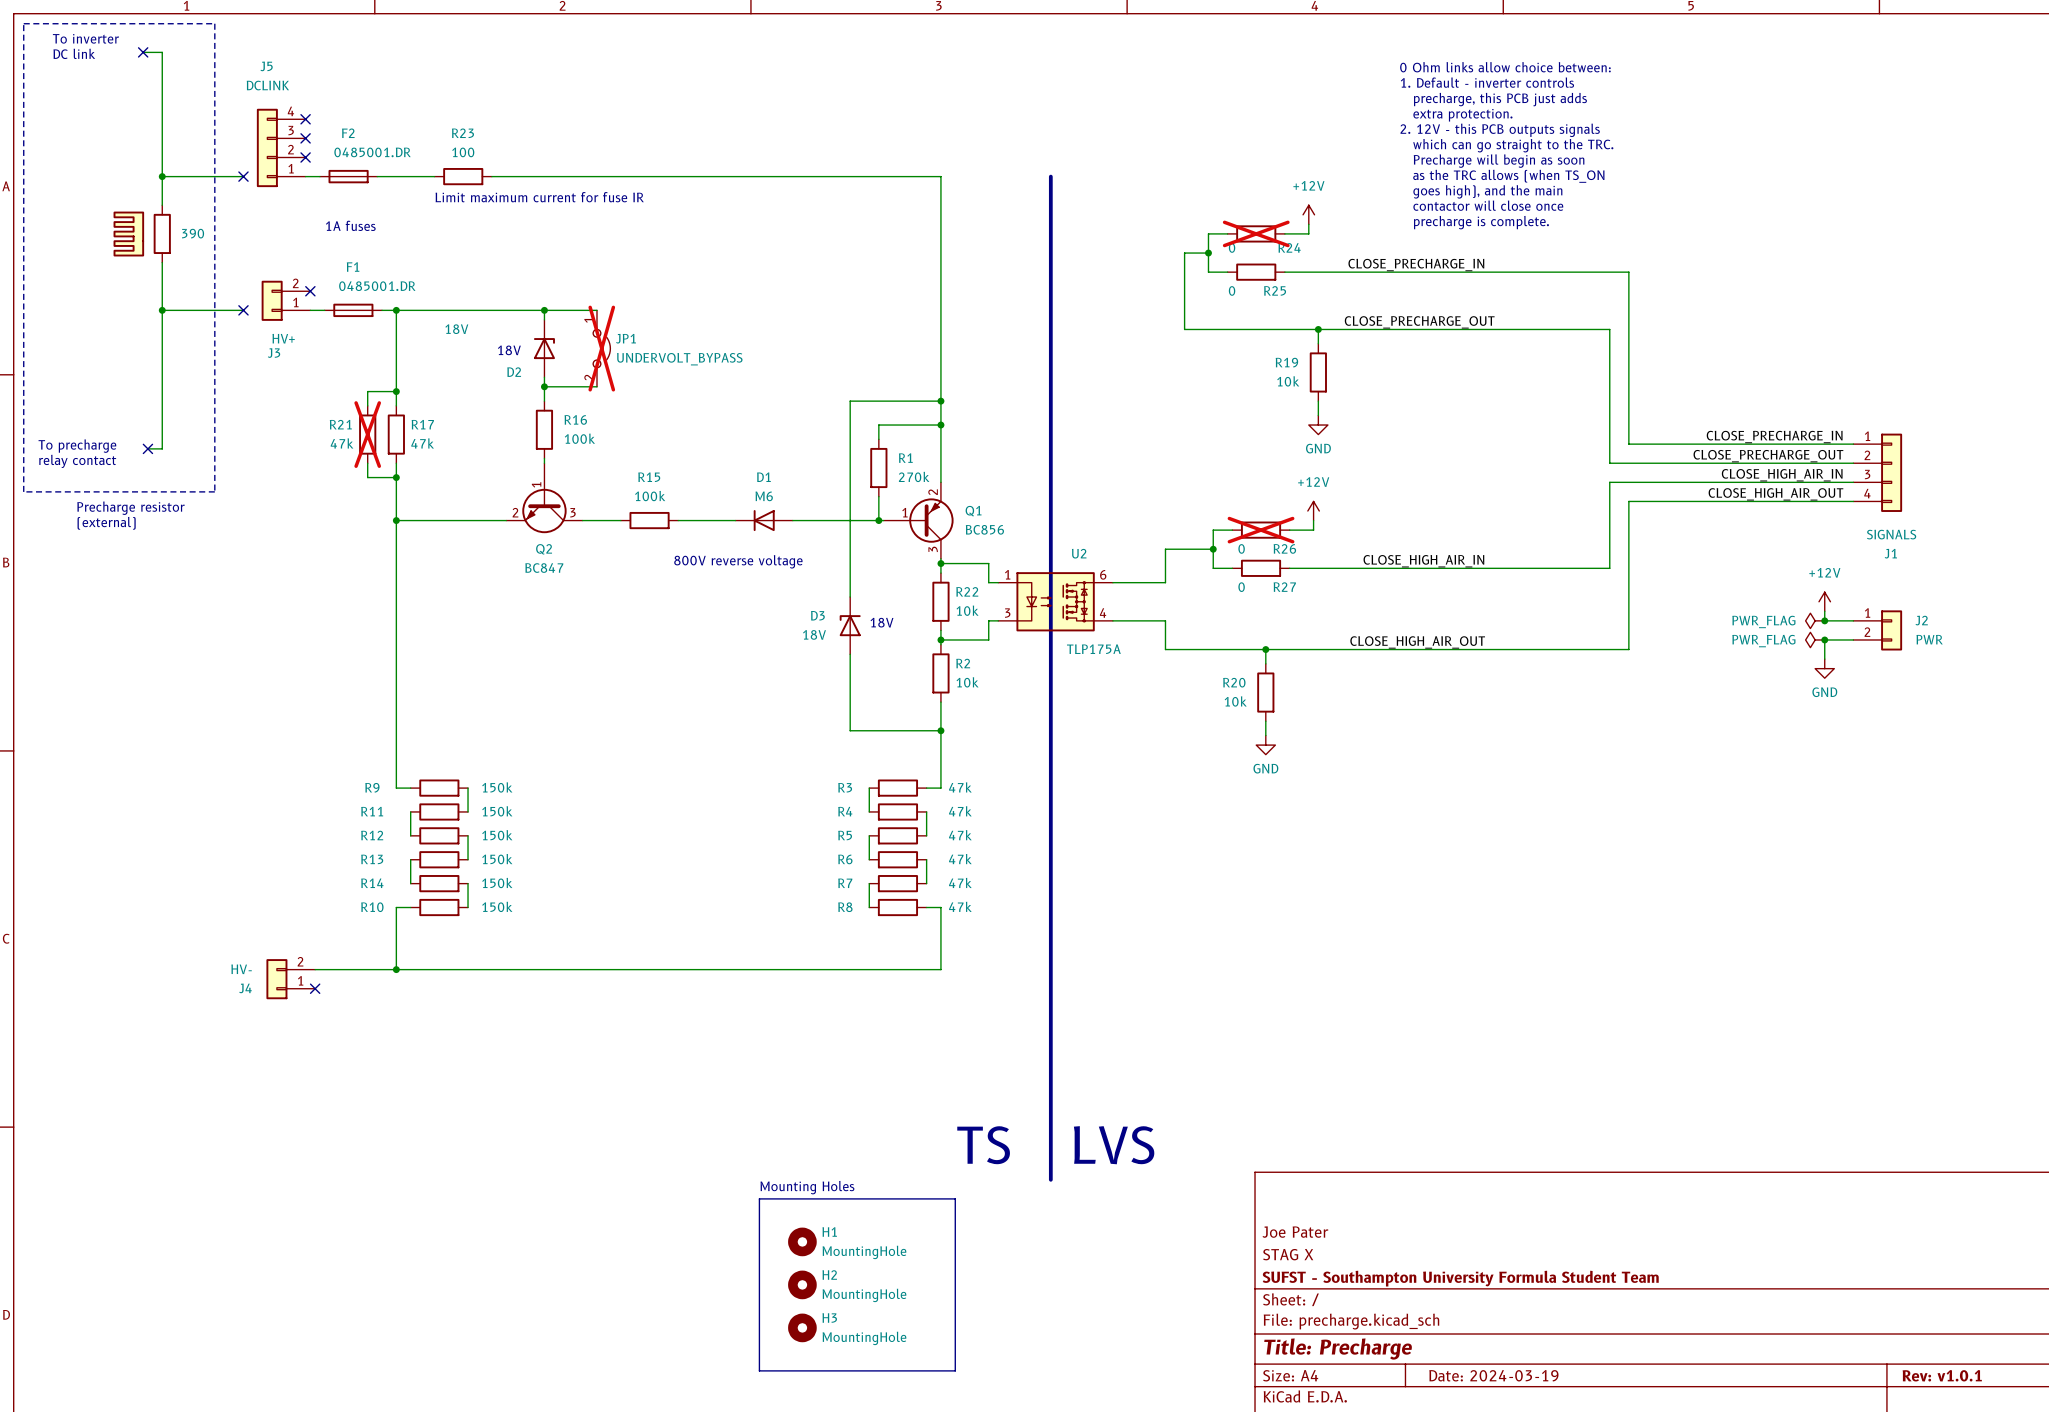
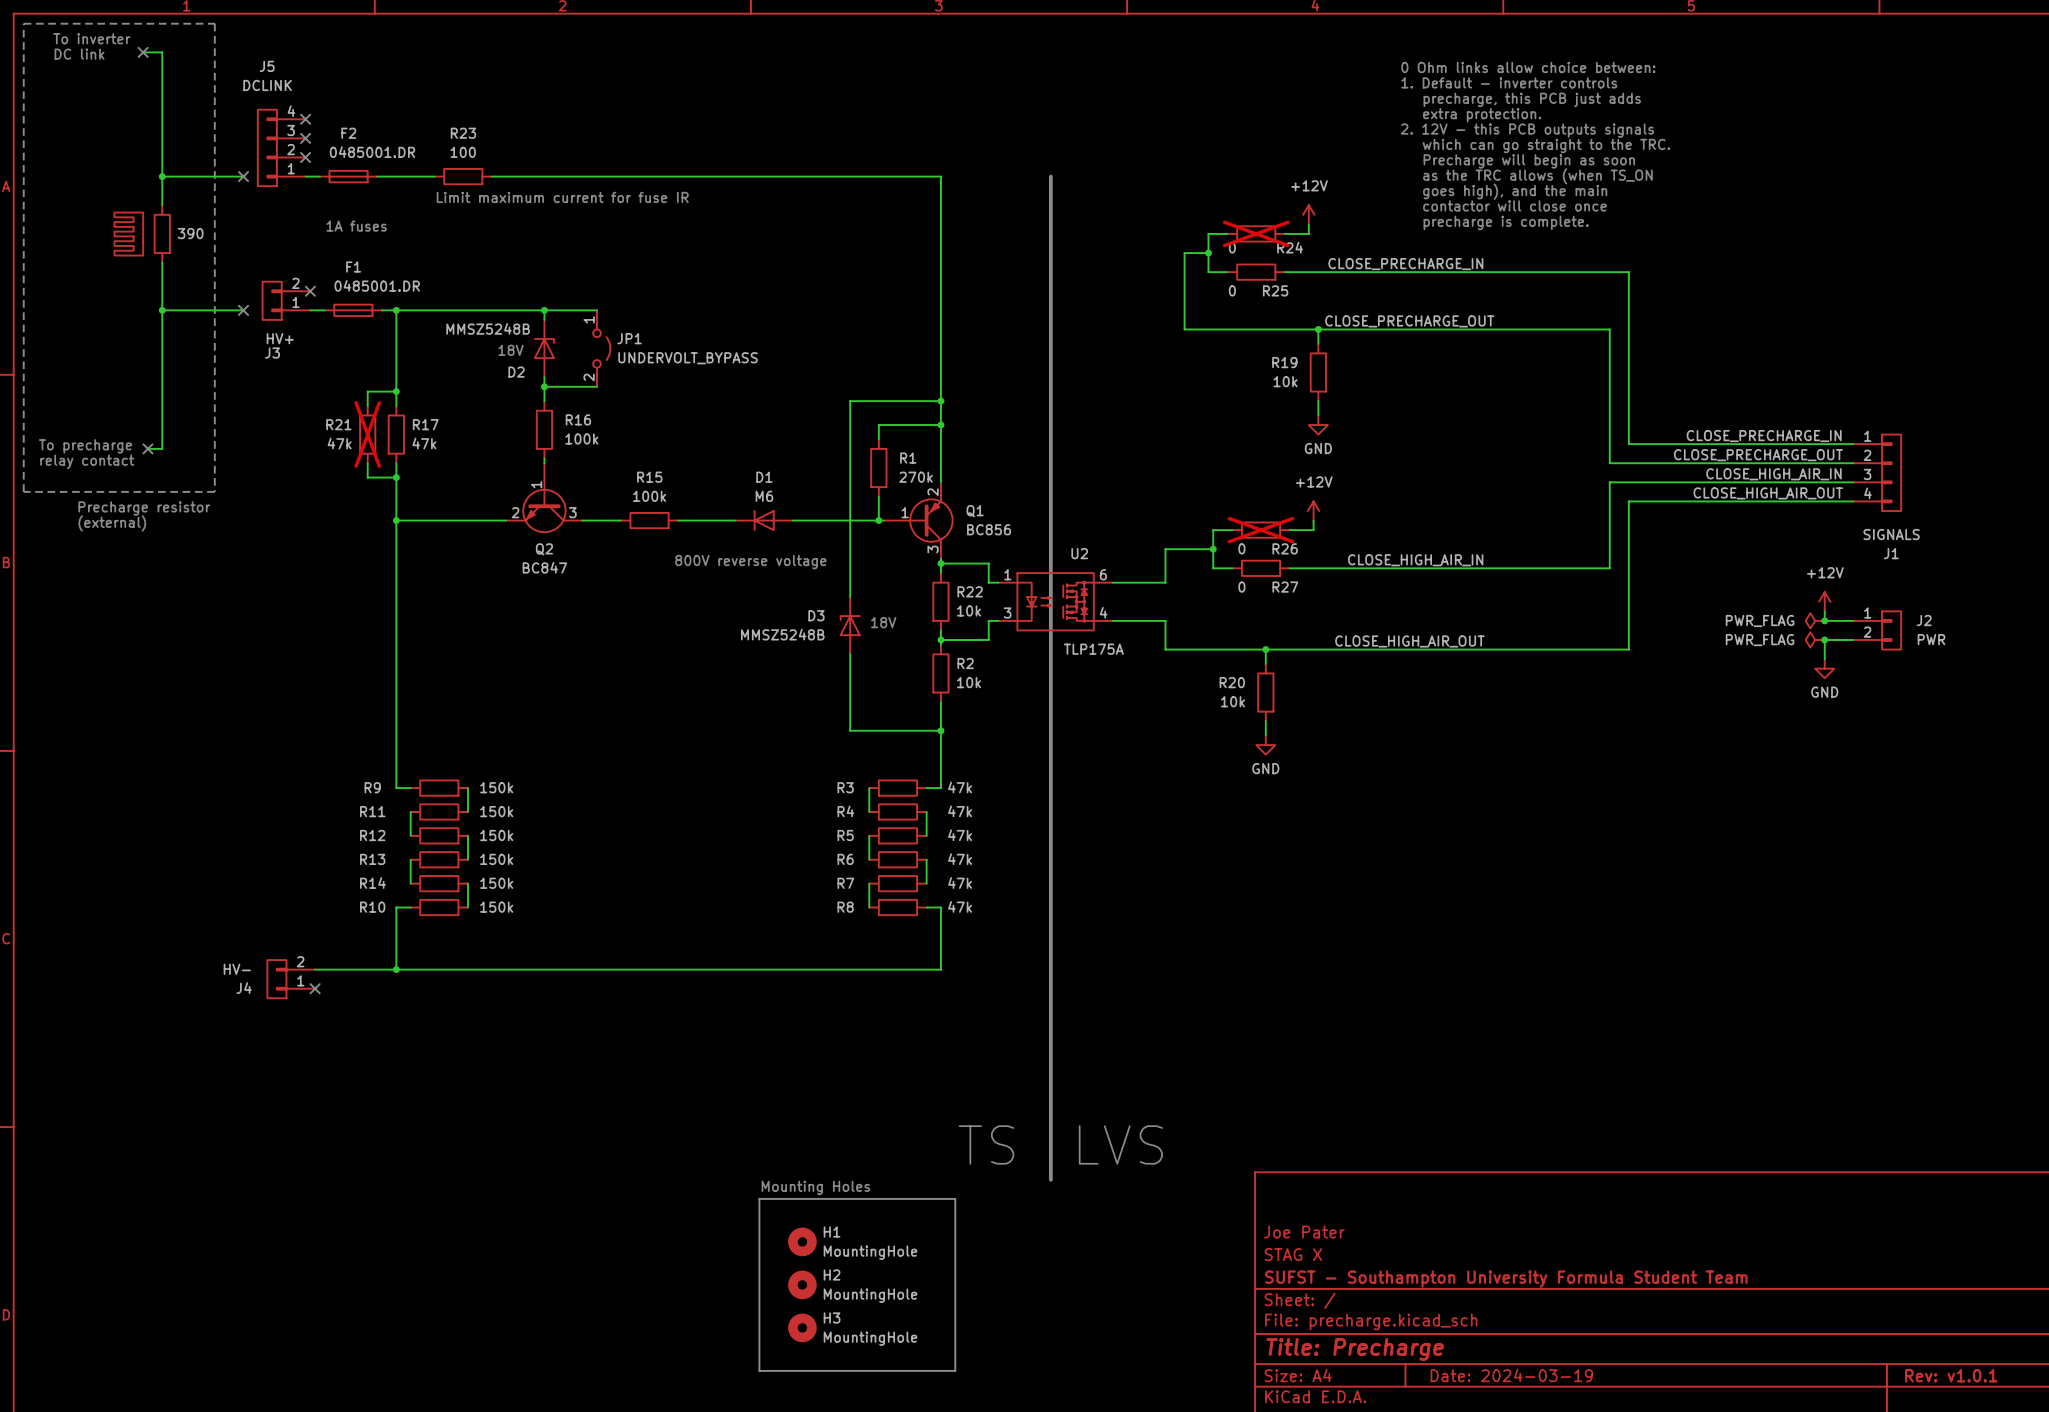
D2 value: 18V (456, 329) -> MMSZ5248B (488, 328)
JP1 do-not-place cross: (601, 348) -> none
D3 value: 18V (814, 634) -> MMSZ5248B (782, 634)

